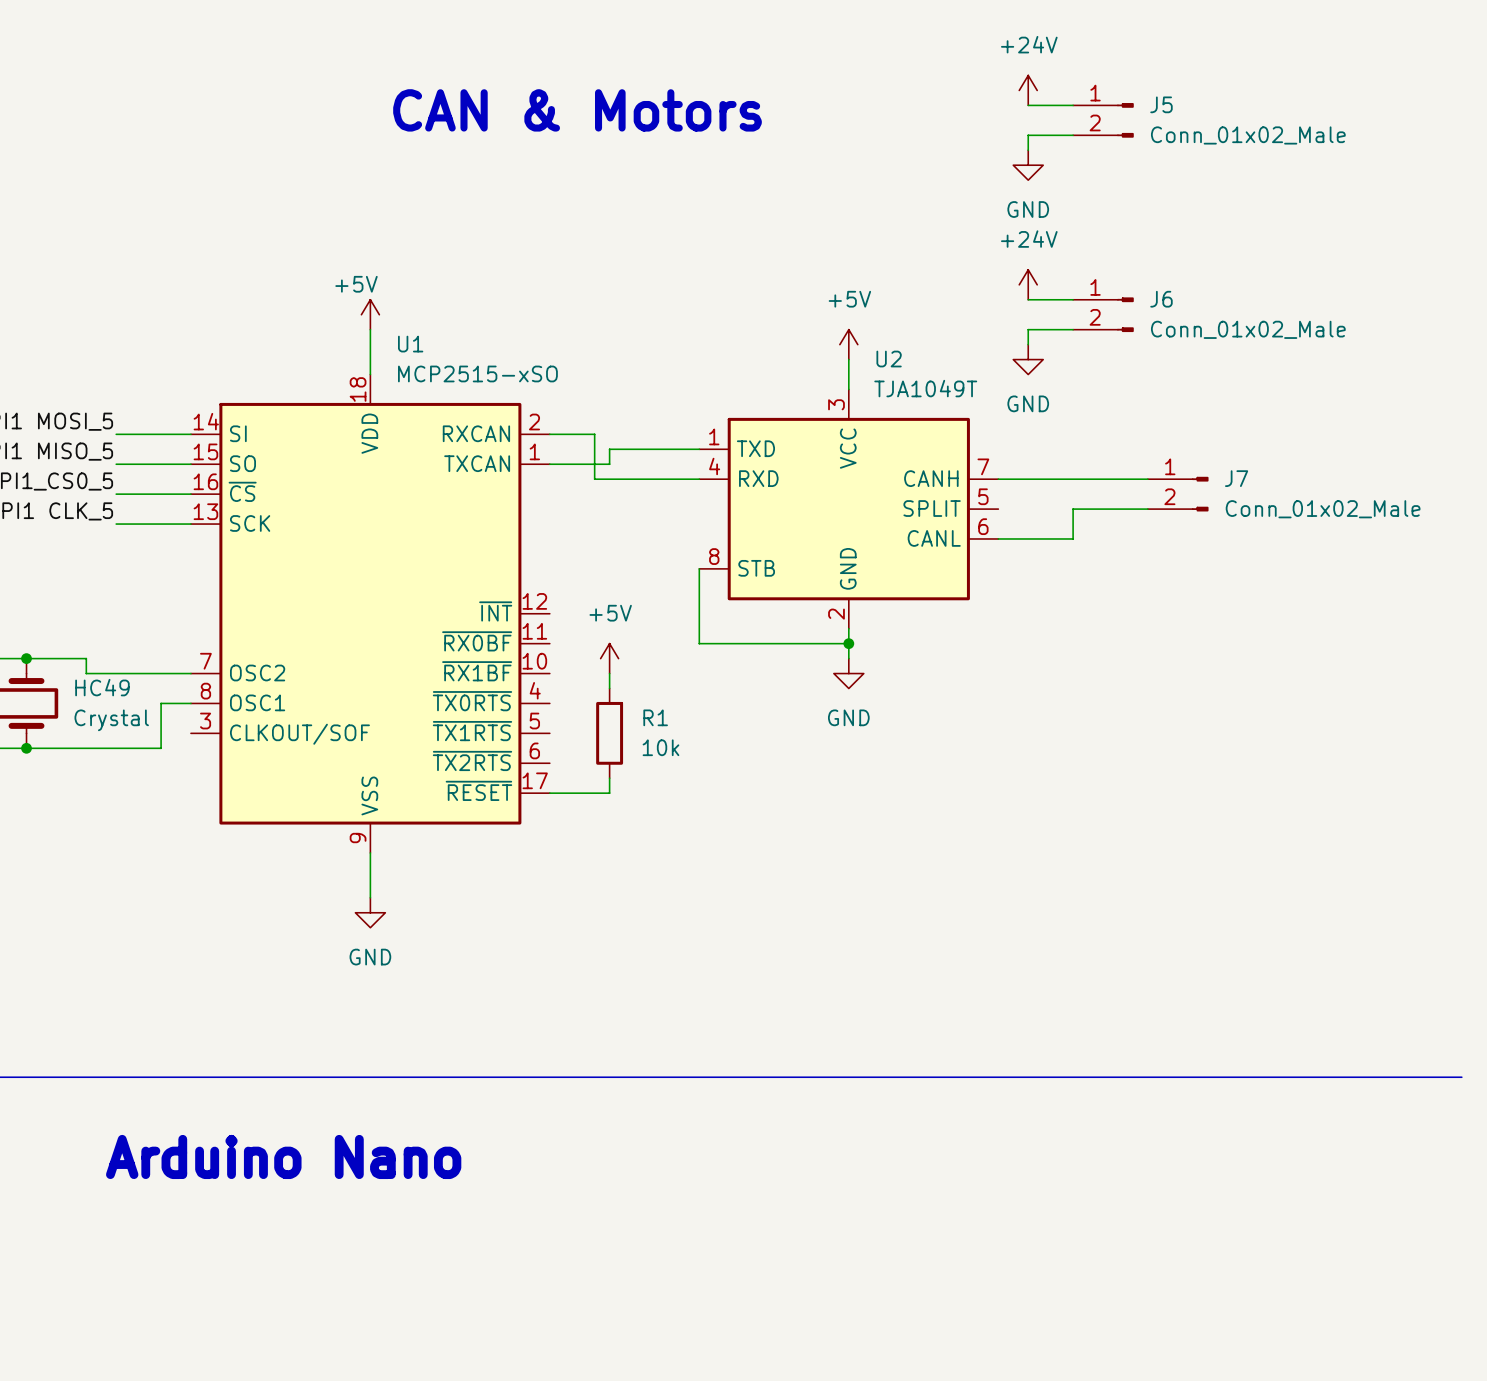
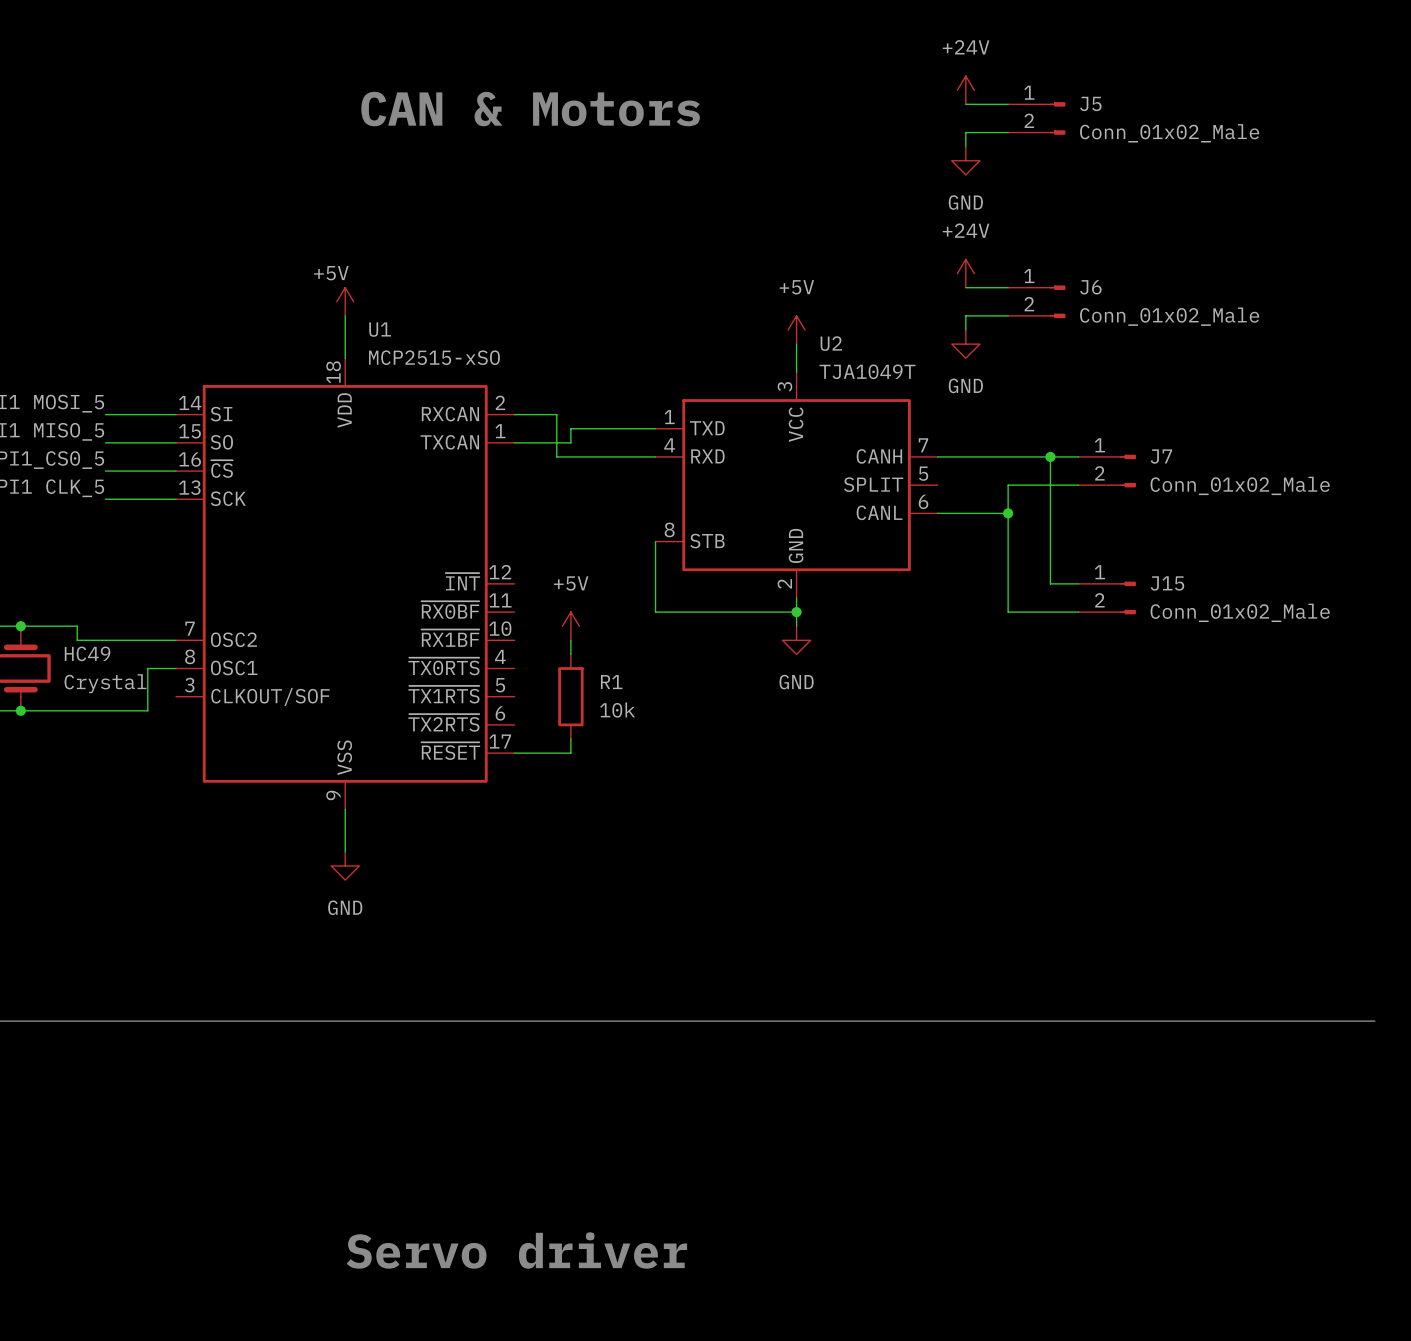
wire: none -> (1050, 456) (1050, 583) (1078, 583)
junction: none -> (1050, 456)
wire: none -> (1008, 513) (1008, 612) (1078, 612)
junction: none -> (1008, 513)
J15: none -> Conn_01x02_Male (1107, 597)
text: Arduino Nano (283, 1156) -> none
text: none -> Servo driver (516, 1250)

